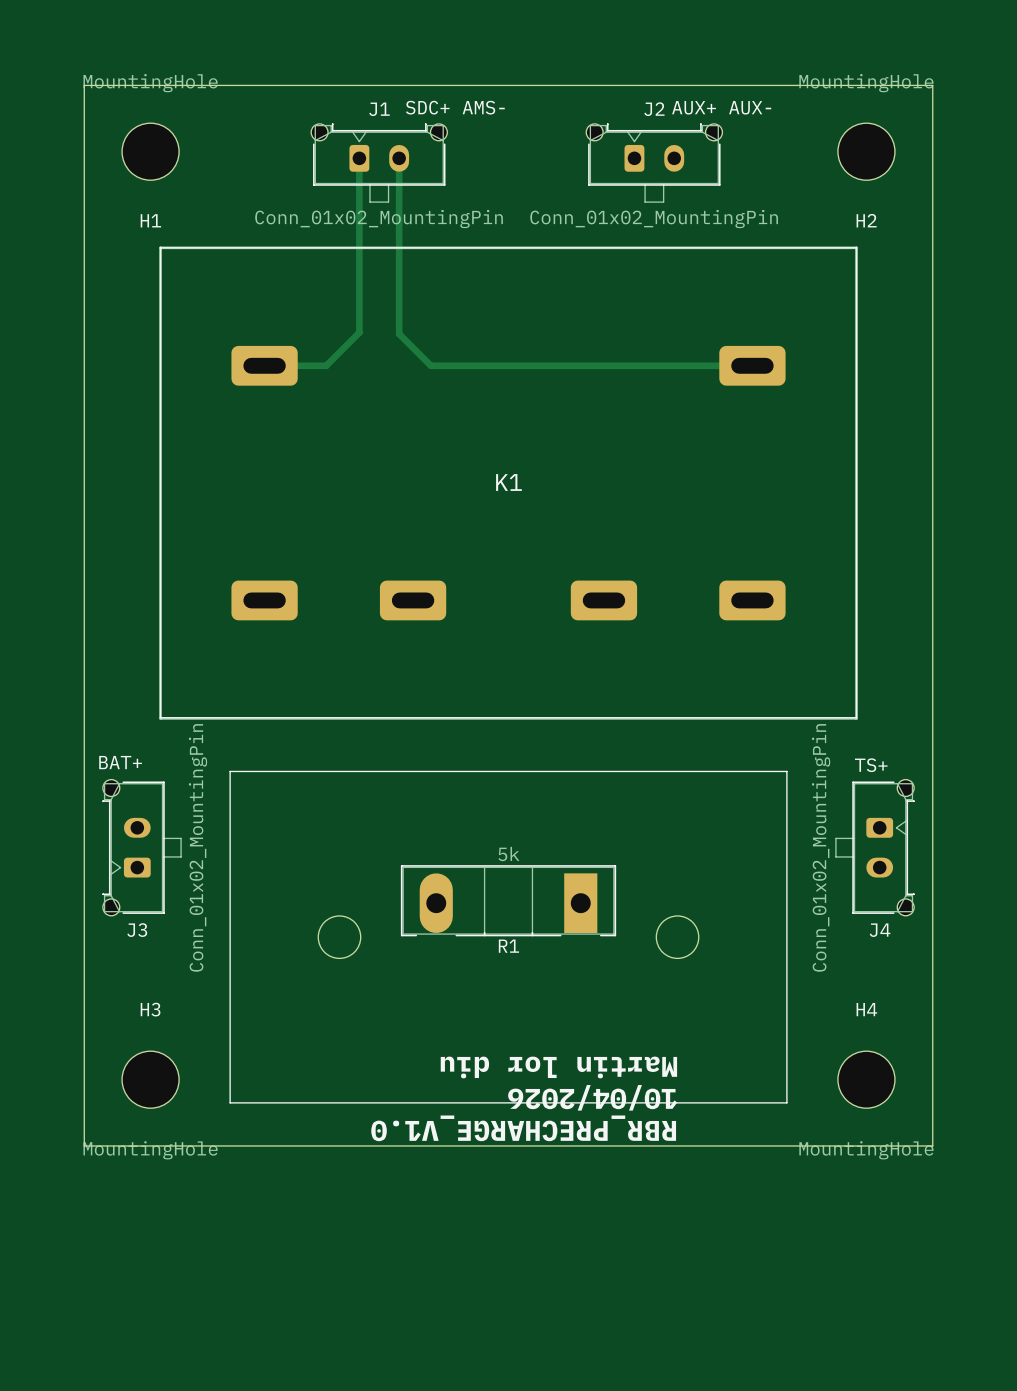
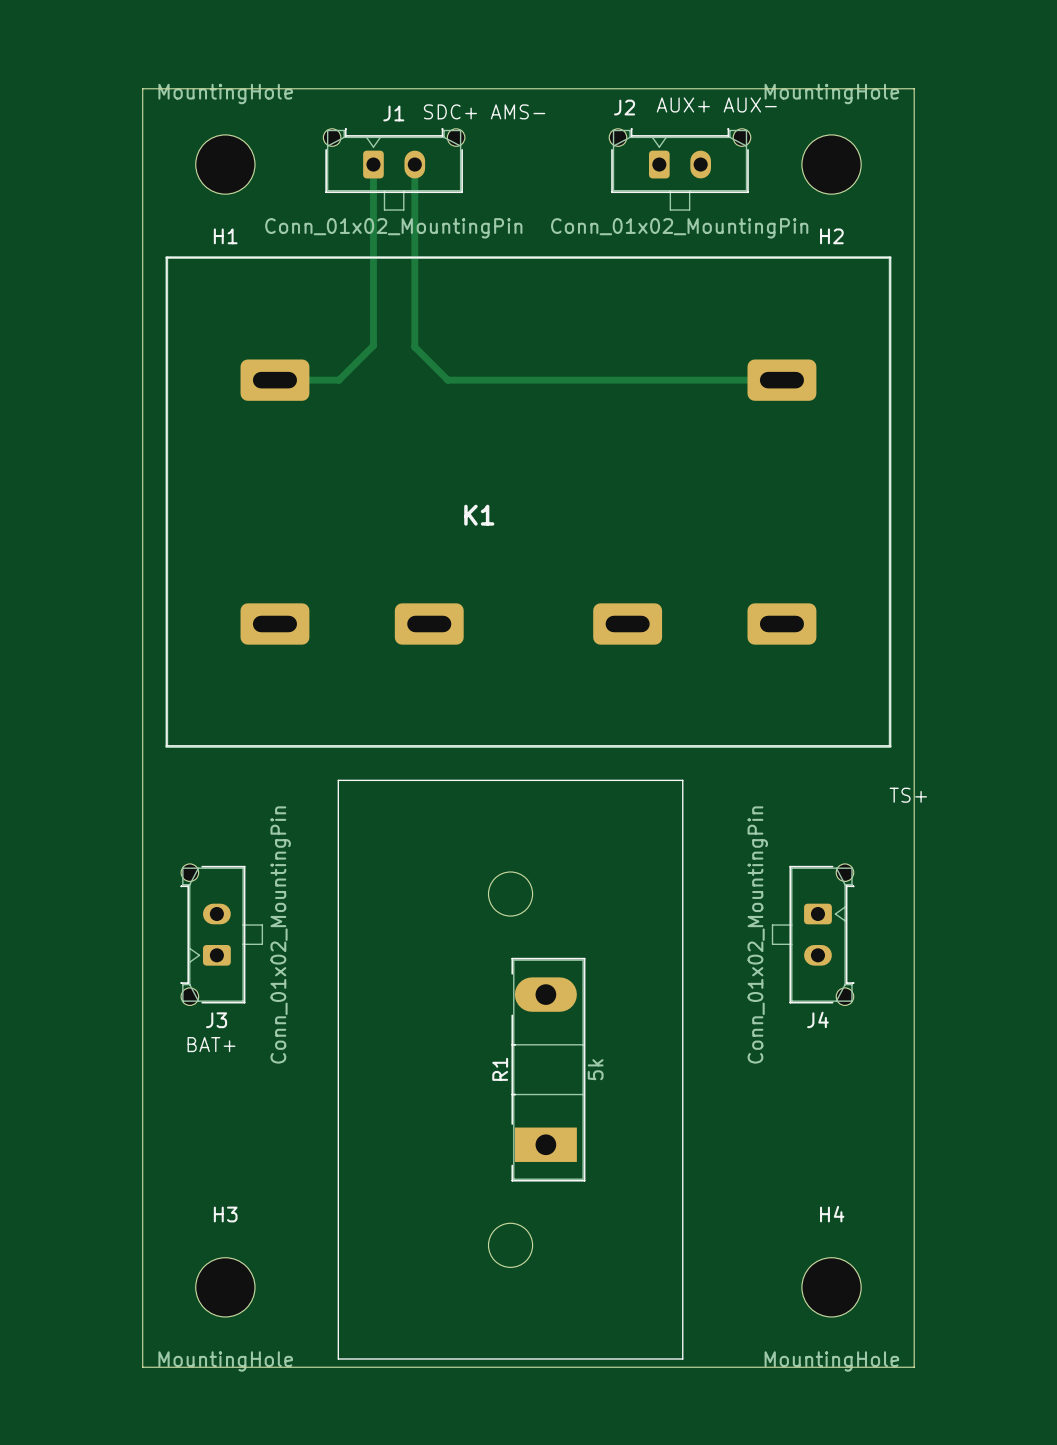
board edge: (137, 85) (84, 85) (84, 1145) (932, 1145) (932, 85) (879, 85) -> (142, 88) (142, 1367) (914, 1367) (914, 88)
text position: AUX+ AUX- (721, 107) -> AUX+ AUX- (716, 104)
J2 name position: J2 (654, 109) -> J2 (624, 107)
H1 position: (150, 151) -> (225, 164)
H2 position: (866, 151) -> (831, 164)
K1 name position: K1 (508, 482) -> K1 (479, 515)
line: none -> (338, 780) (682, 780) (682, 1358) (338, 1358) (338, 780)
text position: BAT+ (120, 762) -> BAT+ (211, 1044)
line: (230, 771) (786, 771) (786, 1102) (230, 1102) (230, 771) -> none
round board edge: none -> [488, 871, 533, 917]
J3 position: (142, 847) -> (221, 934)
J4 position: (875, 847) -> (813, 934)
R1 rotation: 0° (508, 900) -> 90° clockwise (548, 1069)
R1 position: (508, 900) -> (548, 1069)
round board edge: [317, 915, 362, 959] -> none
round board edge: [656, 915, 700, 959] -> none
text: Martin lor diu (558, 1067) -> none
H3 position: (150, 1079) -> (225, 1287)
H4 position: (866, 1079) -> (831, 1287)
text: 10/04/2026 (592, 1097) -> none
text: RBR_PRECHARGE_V1.0 (523, 1128) -> none
round board edge: none -> [488, 1222, 533, 1268]

